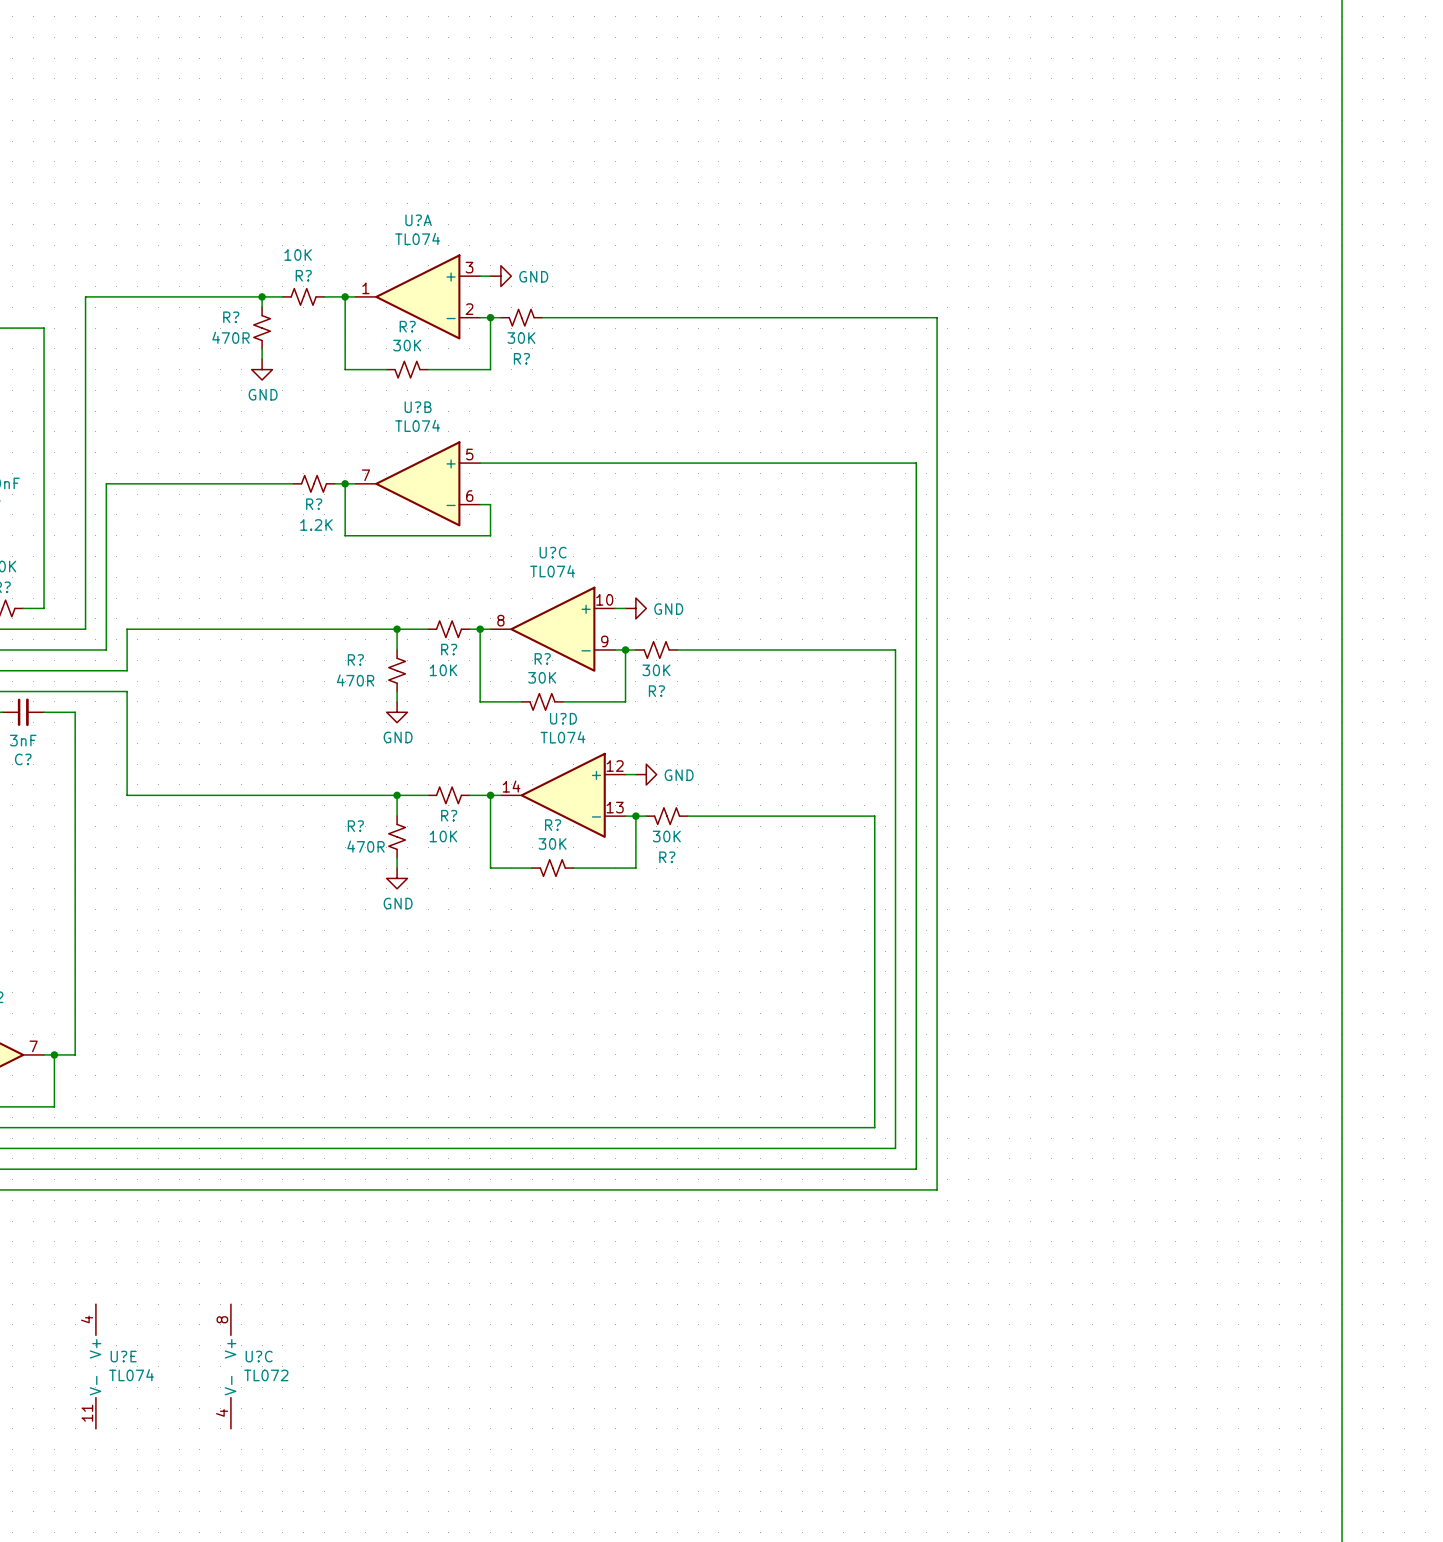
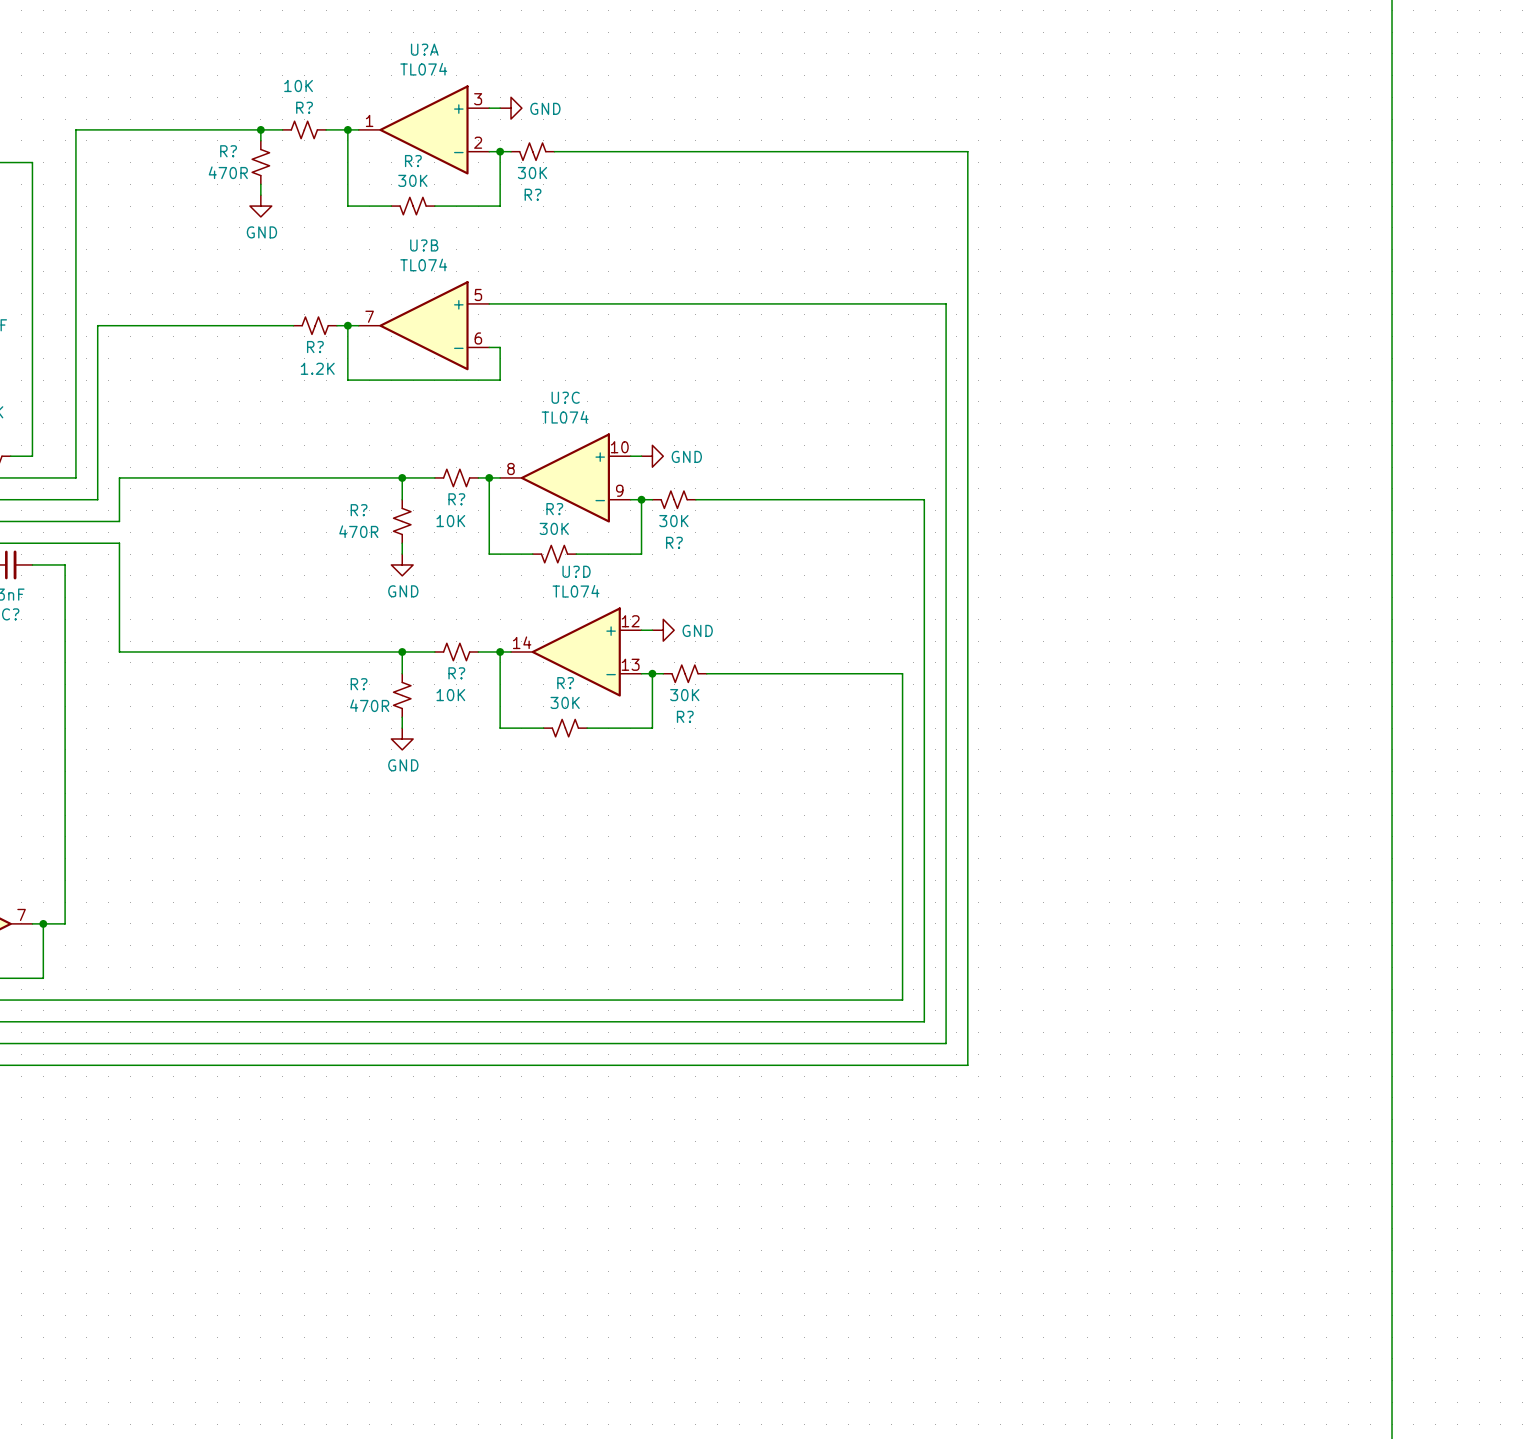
U?E: TL074 (95, 1366) -> none
U?C: TL072 (230, 1366) -> none

